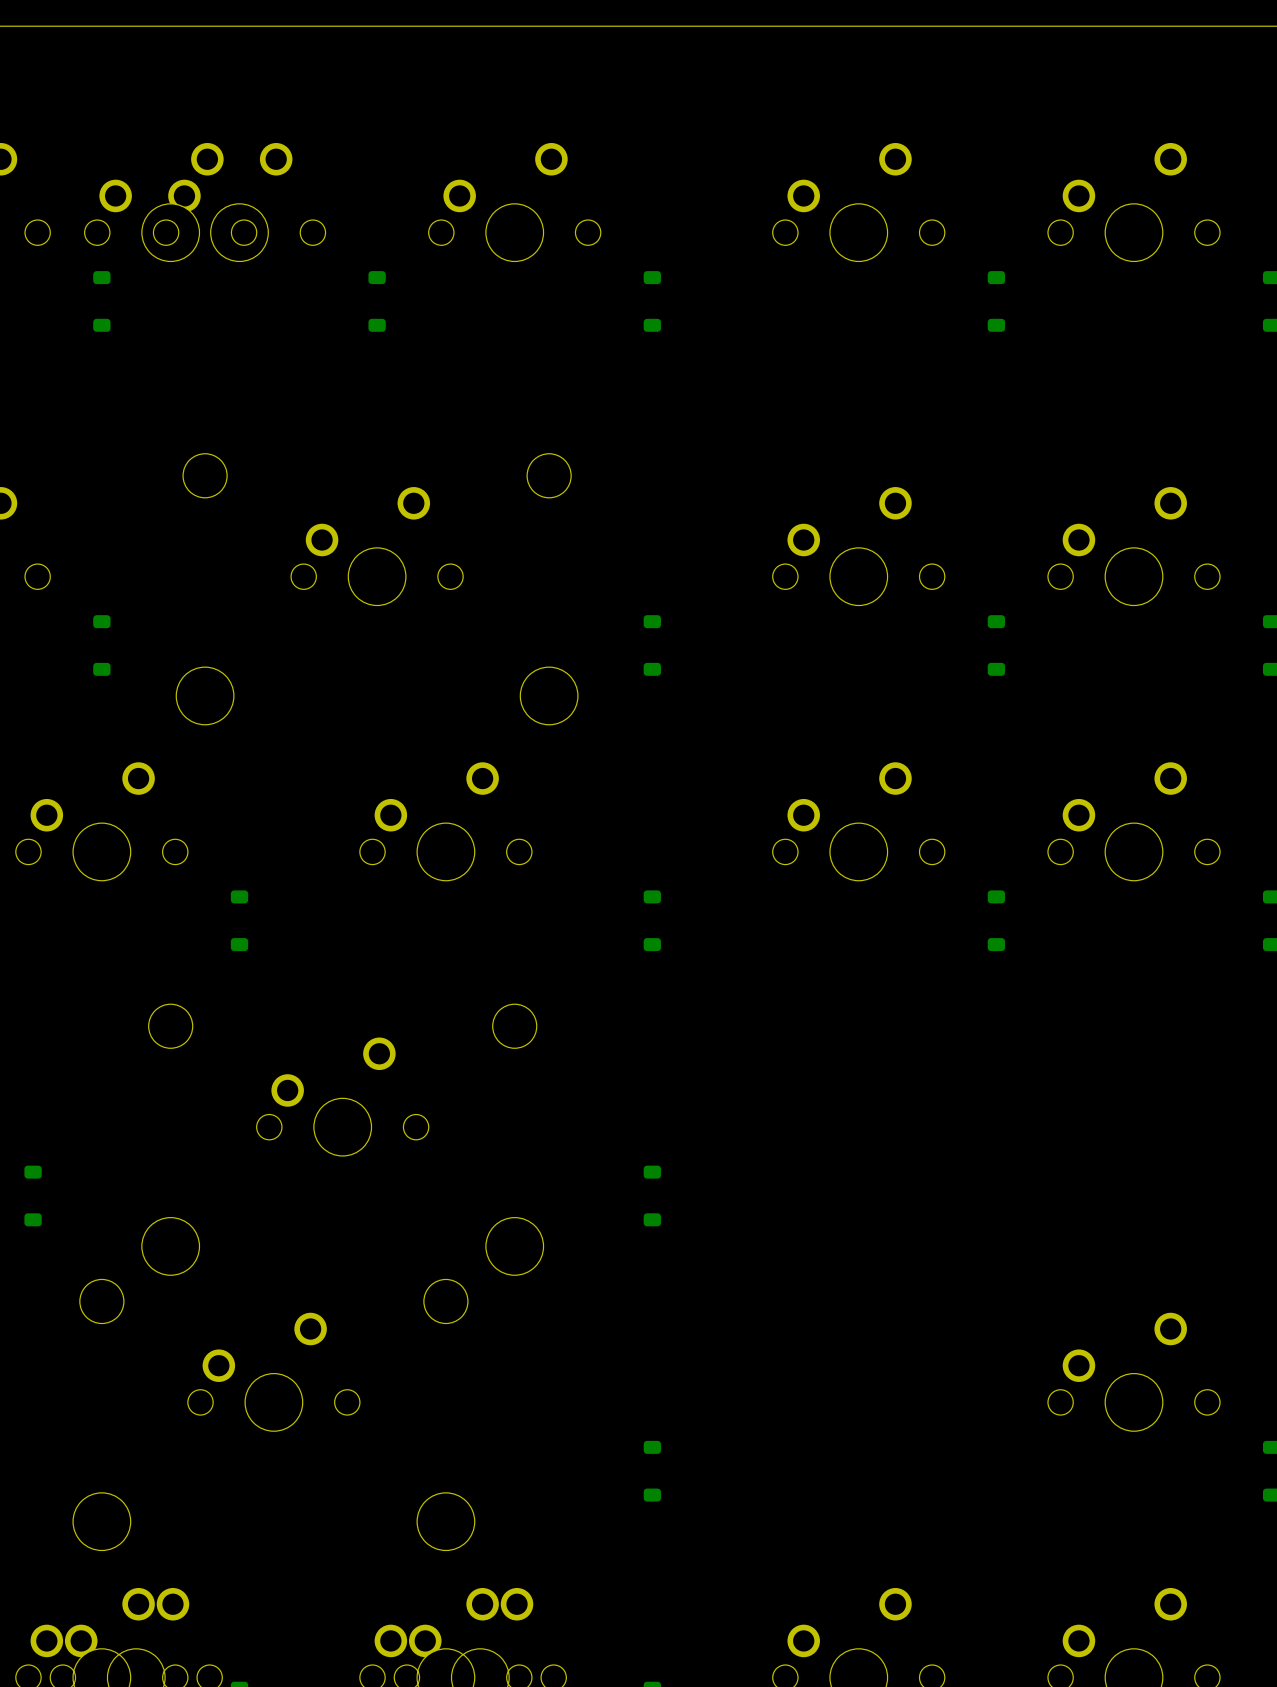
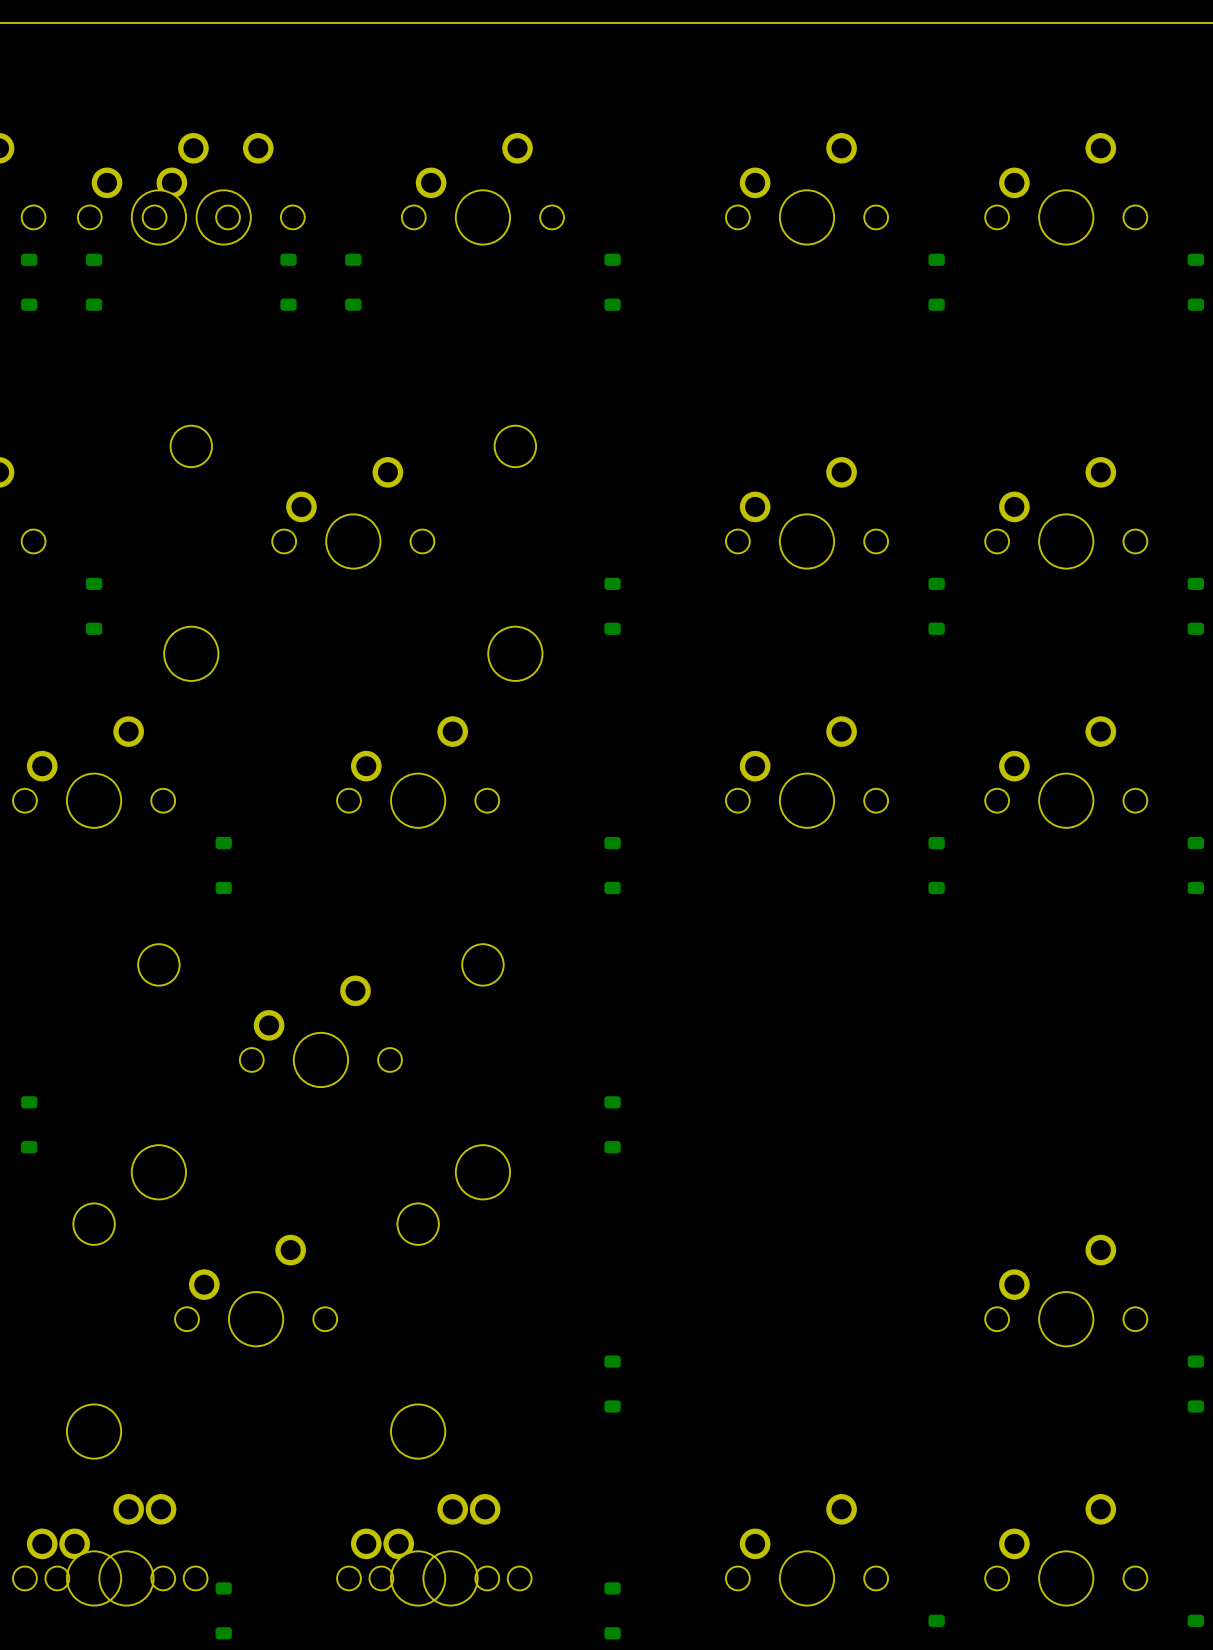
part: none -> (29, 282)
part: none -> (288, 282)

